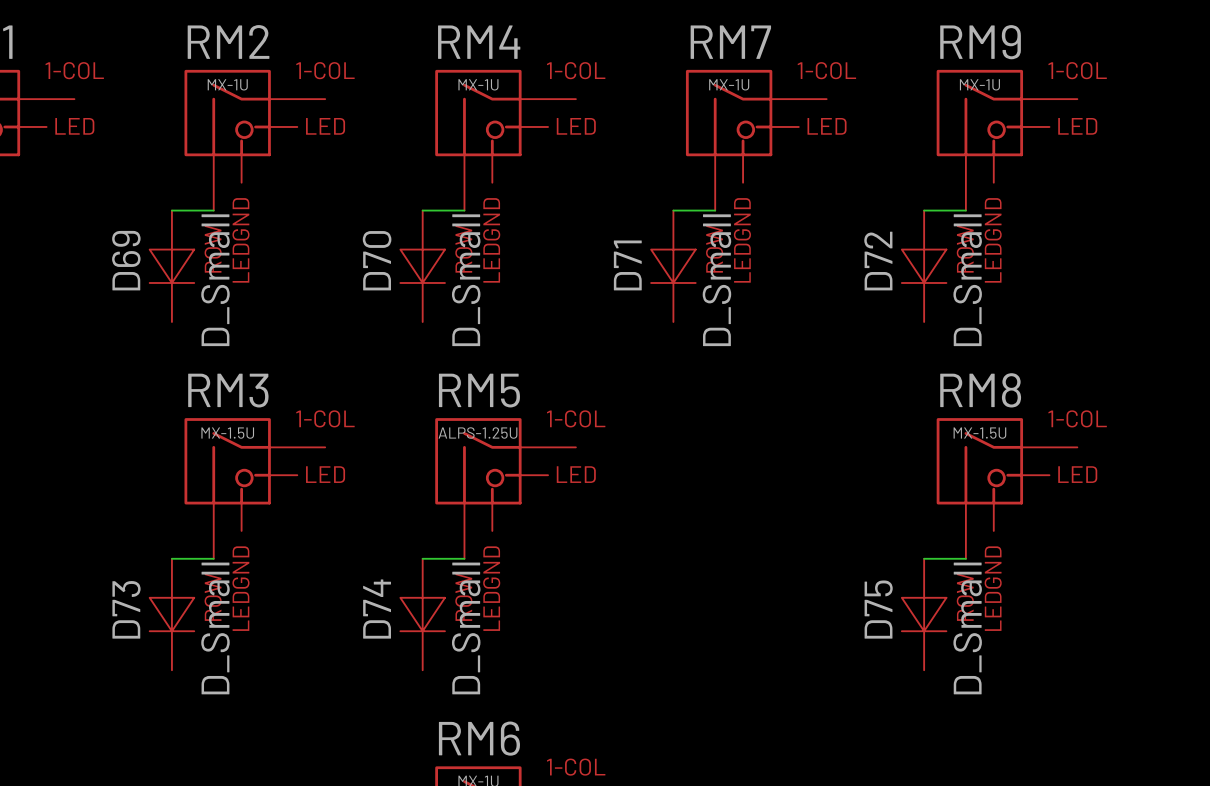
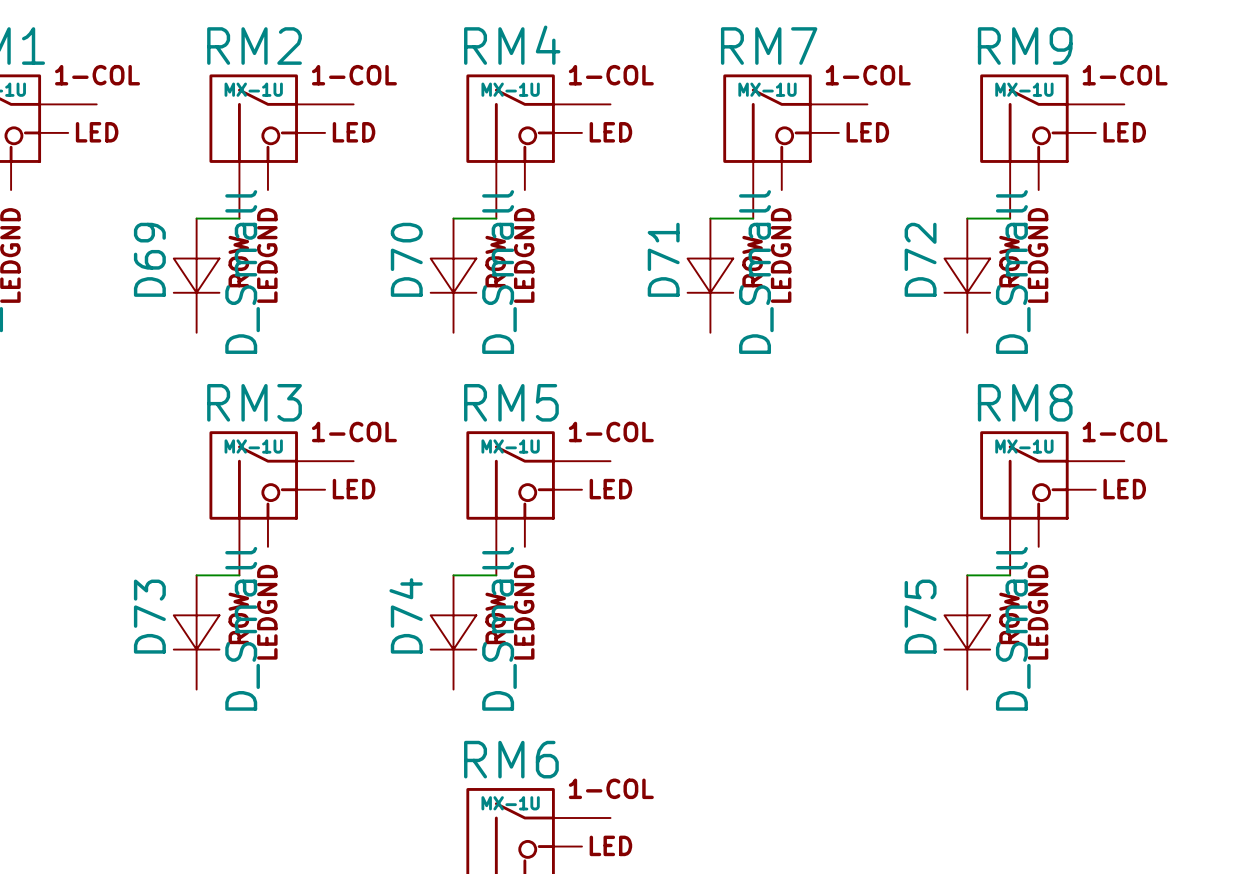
RM3 value: MX-1.5U (227, 433) -> MX-1U (253, 446)
RM5 value: ALPS-1.25U (477, 433) -> MX-1U (510, 446)
RM8 value: MX-1.5U (979, 433) -> MX-1U (1024, 446)

